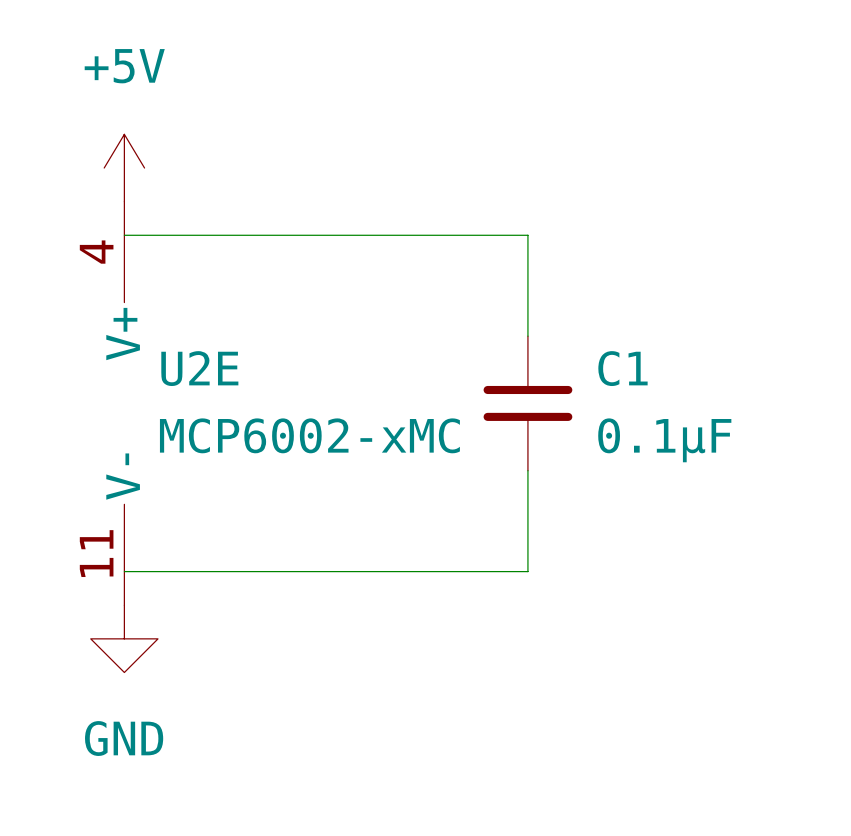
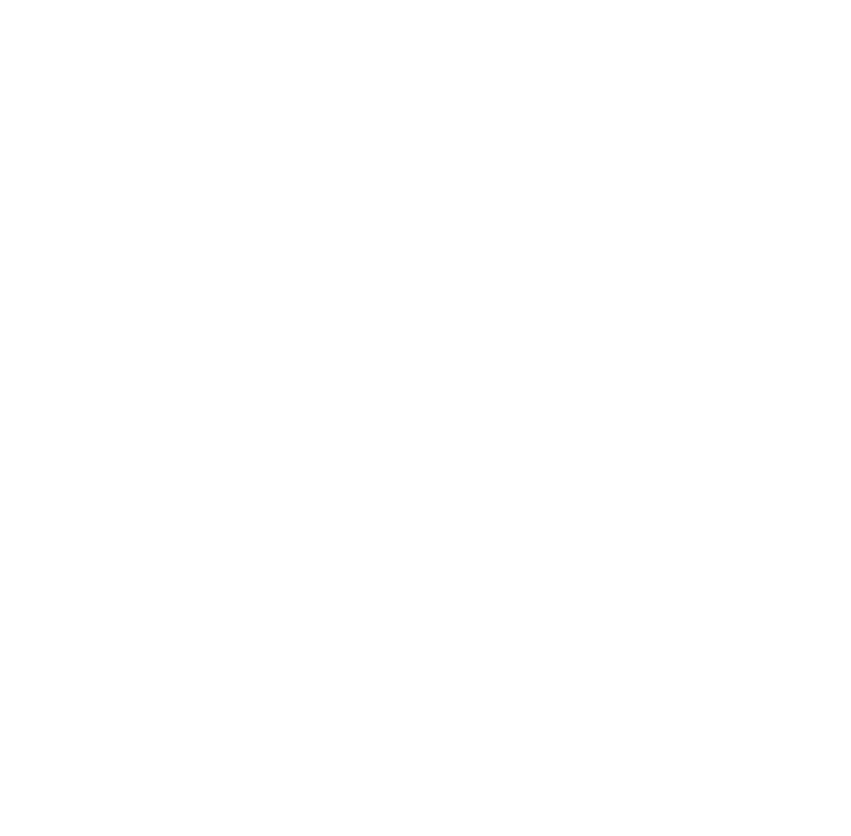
power symbol: +5V (124, 168) -> none
wire: (124, 235) (527, 235) (527, 336) -> none
U2E: MCP6002-xMC (124, 403) -> none
C1: 0.1µF (527, 403) -> none
wire: (527, 470) (527, 571) (124, 571) -> none
power symbol: GND (124, 638) -> none

